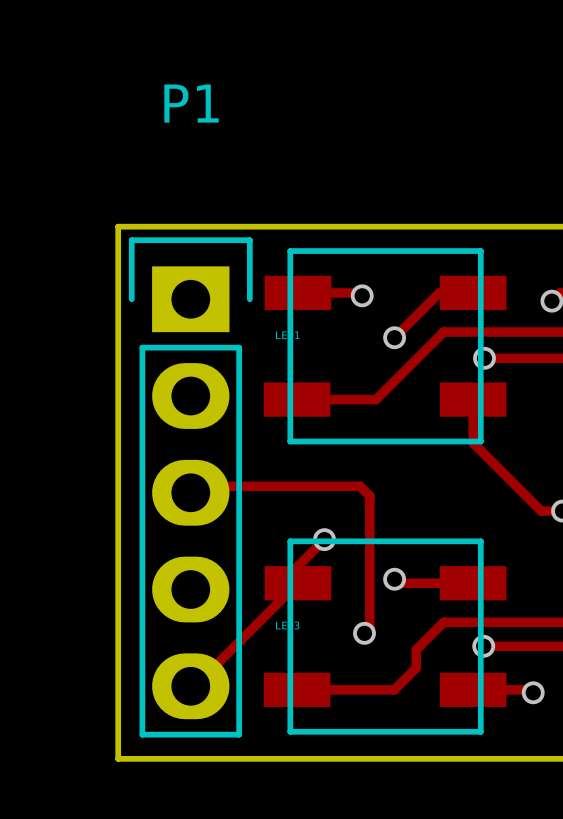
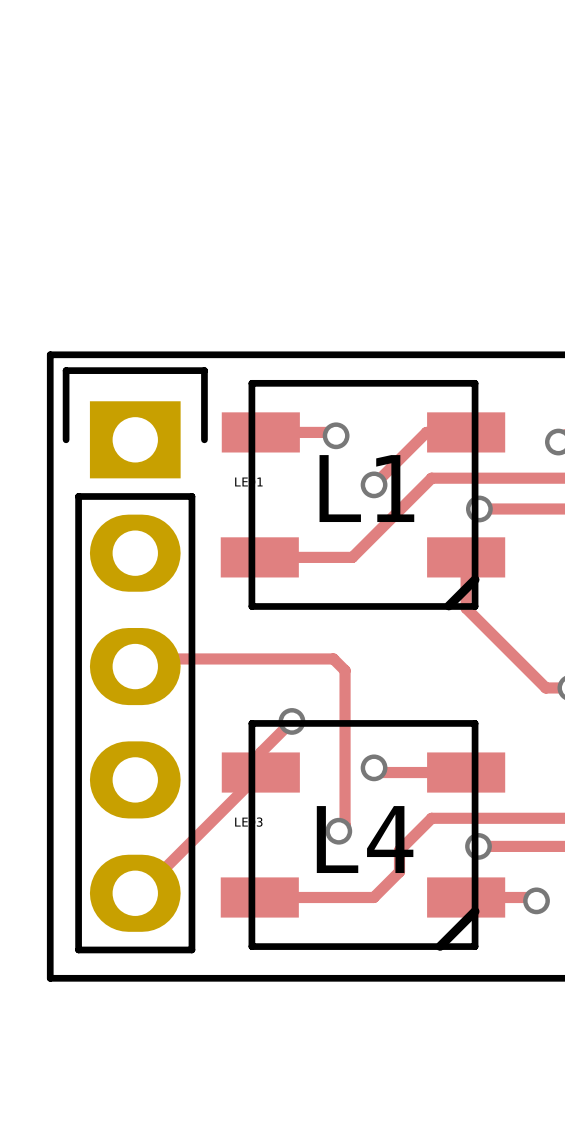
P1 name: P1 (191, 103) -> none
text: none -> L1 (366, 488)
line: none -> (475, 579) (448, 605)
text: none -> L4 (365, 839)
line: none -> (475, 911) (440, 946)

